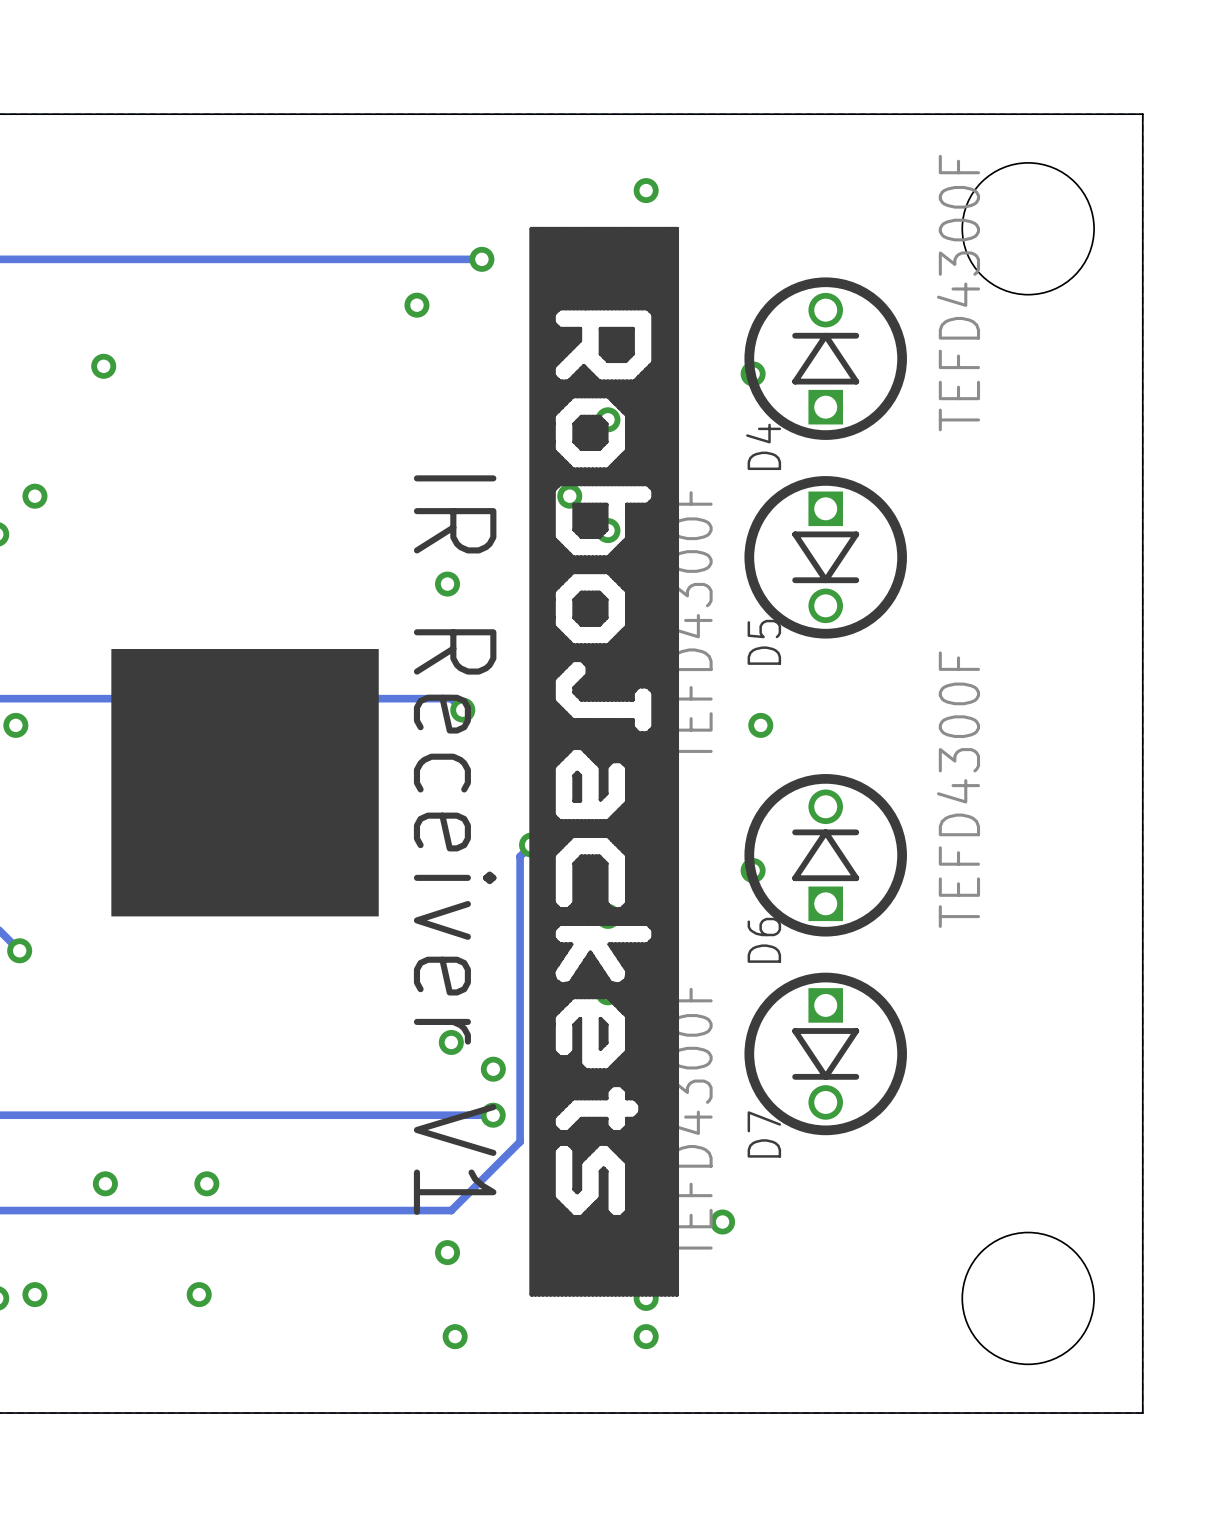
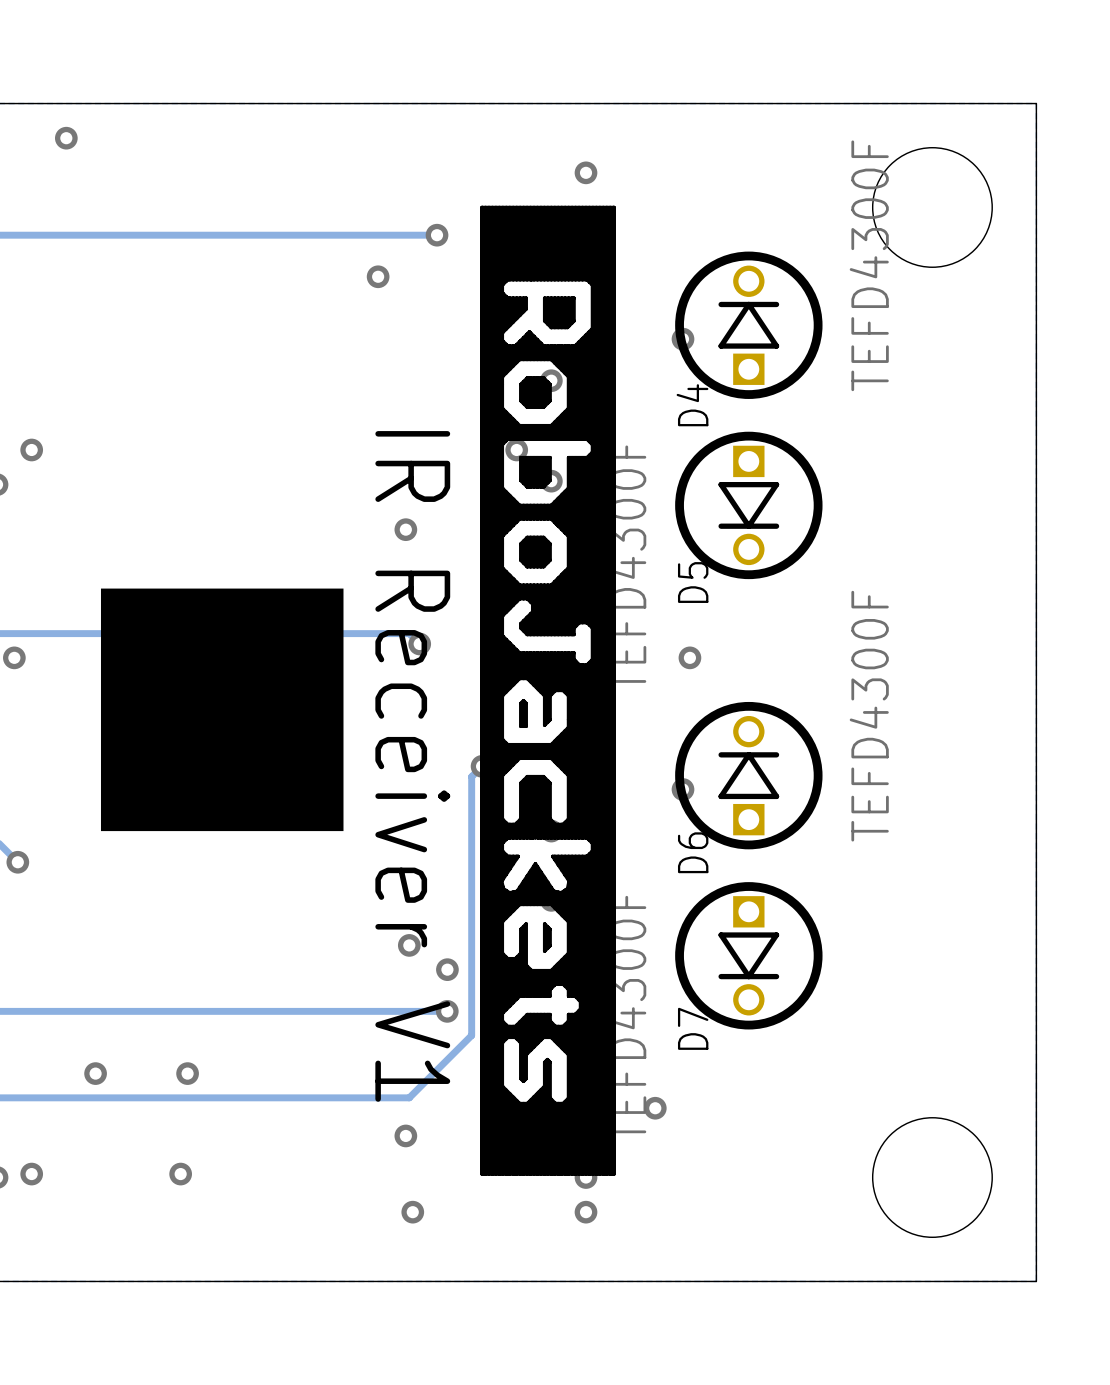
via: none -> (66, 138)
via: (103, 366) -> none

